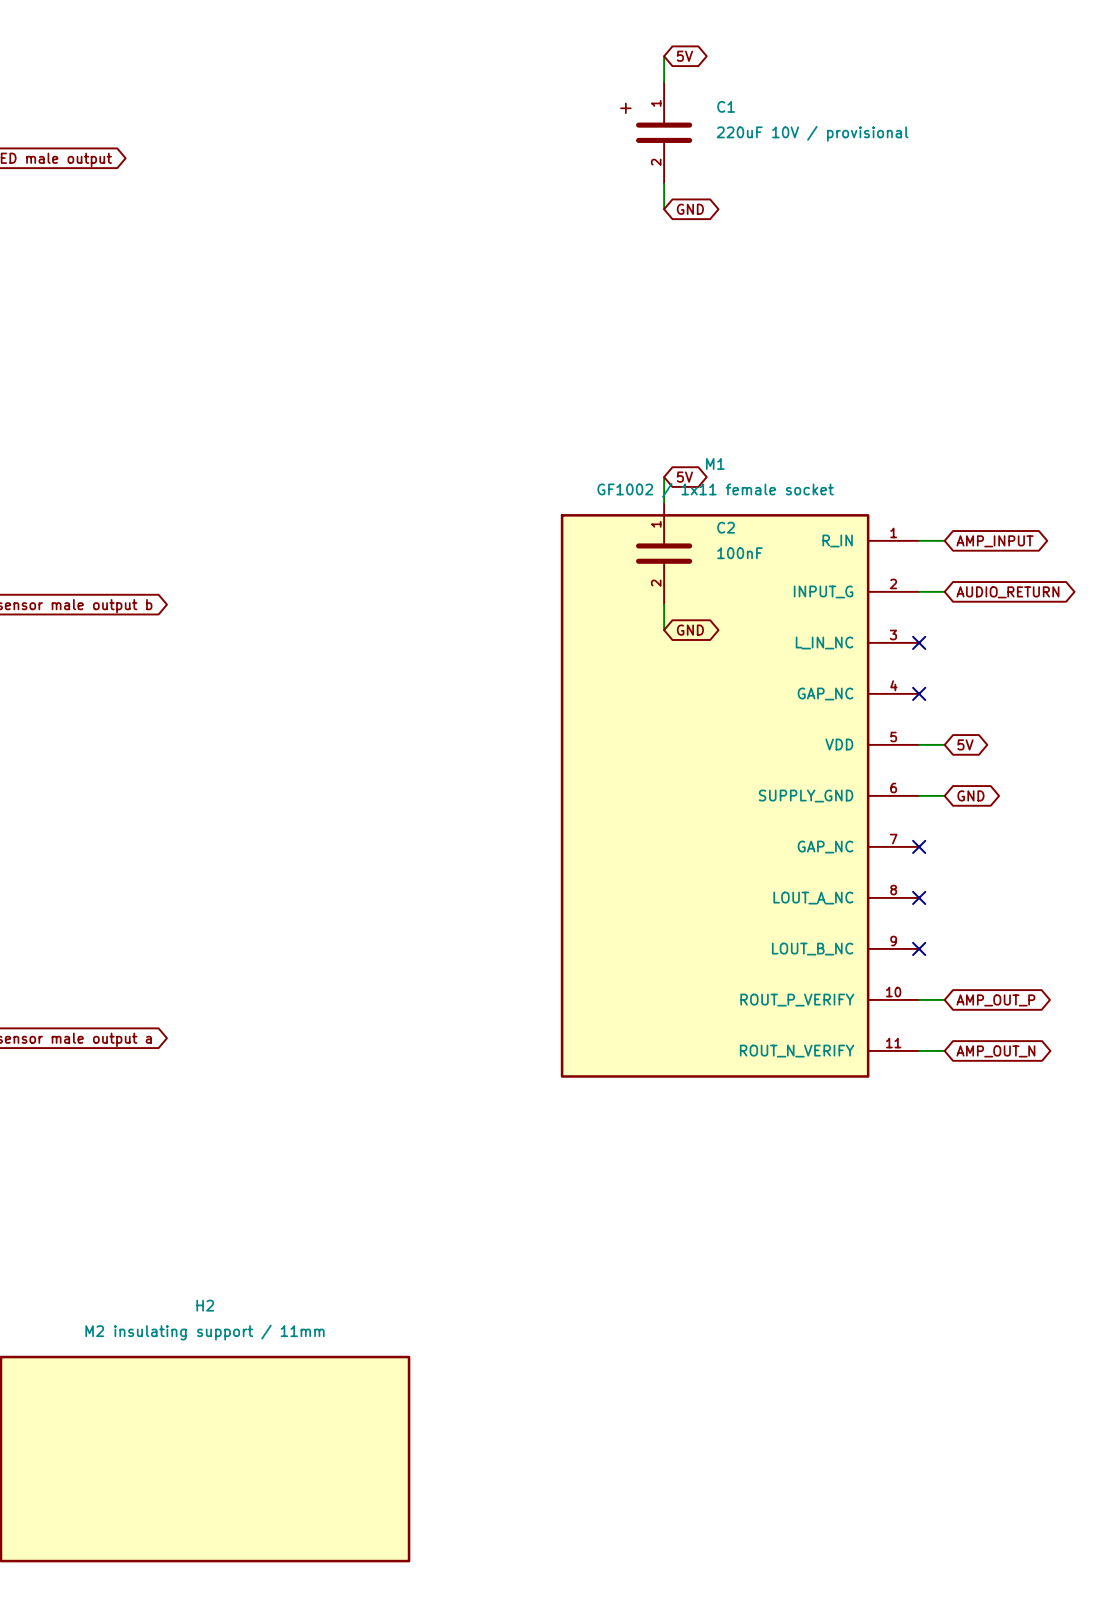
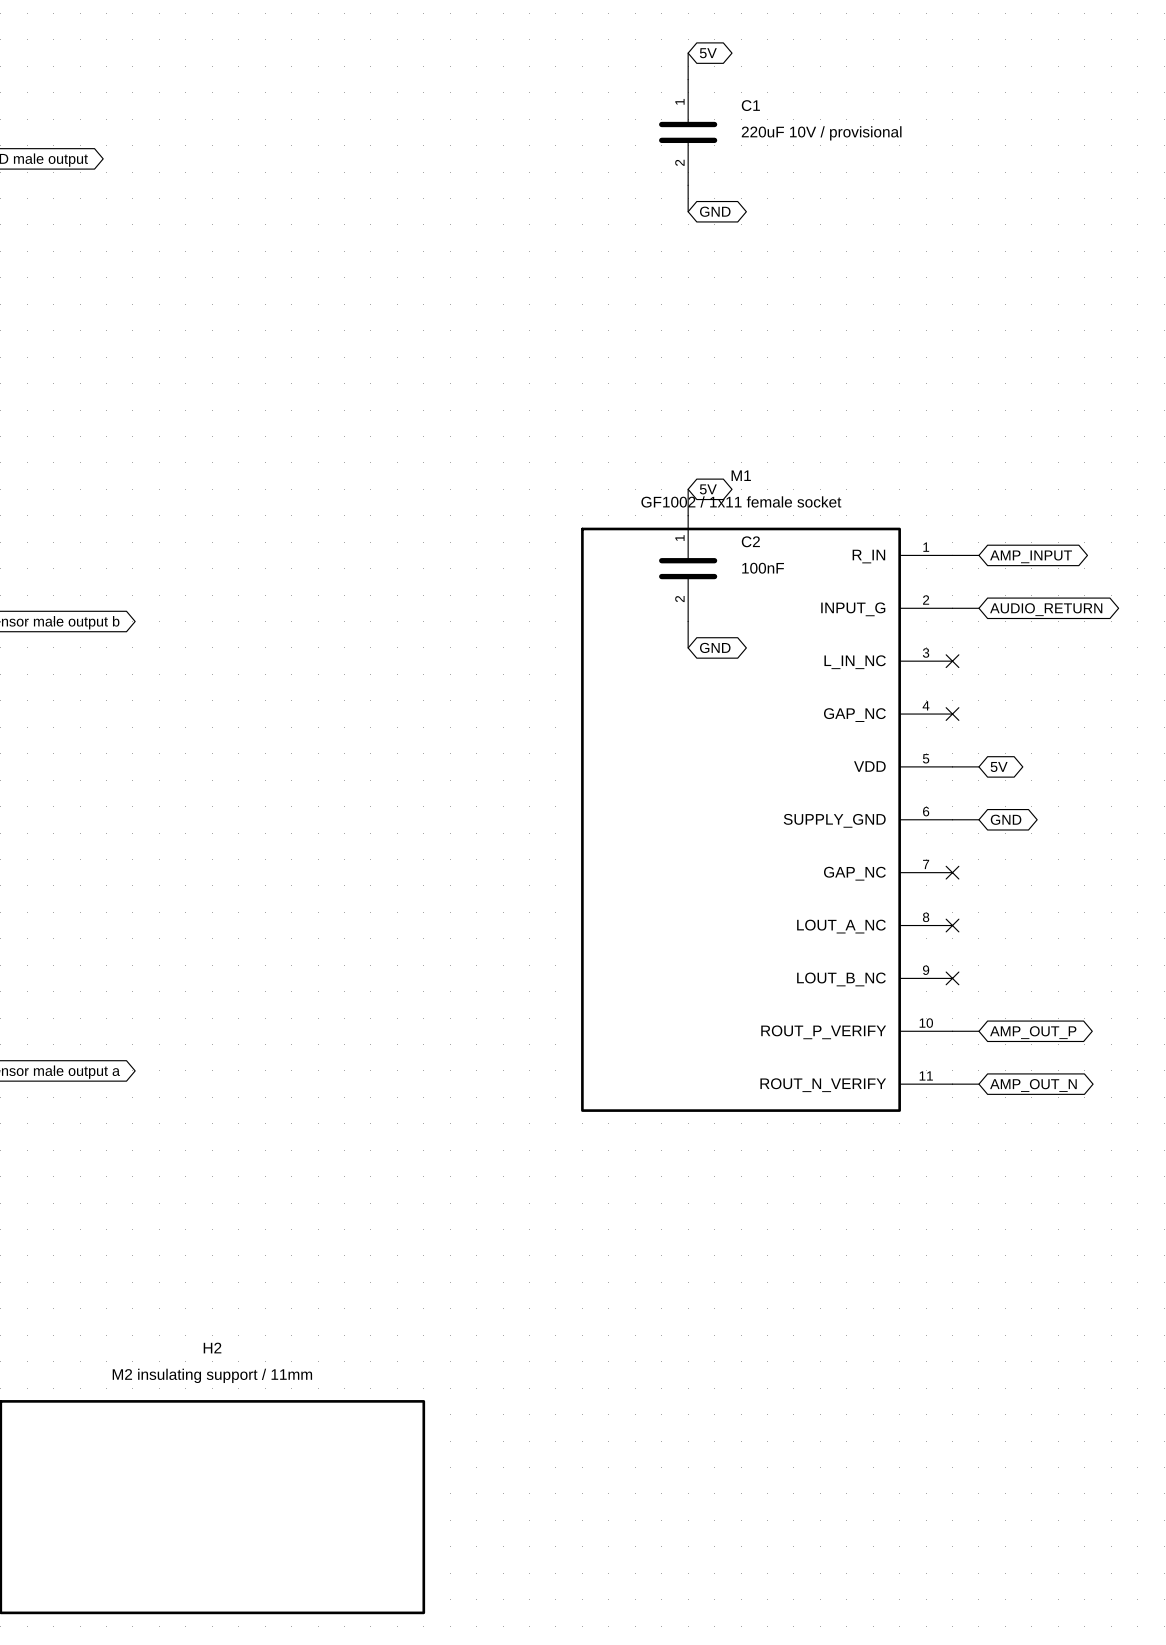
C1 text: + (625, 108) -> none

